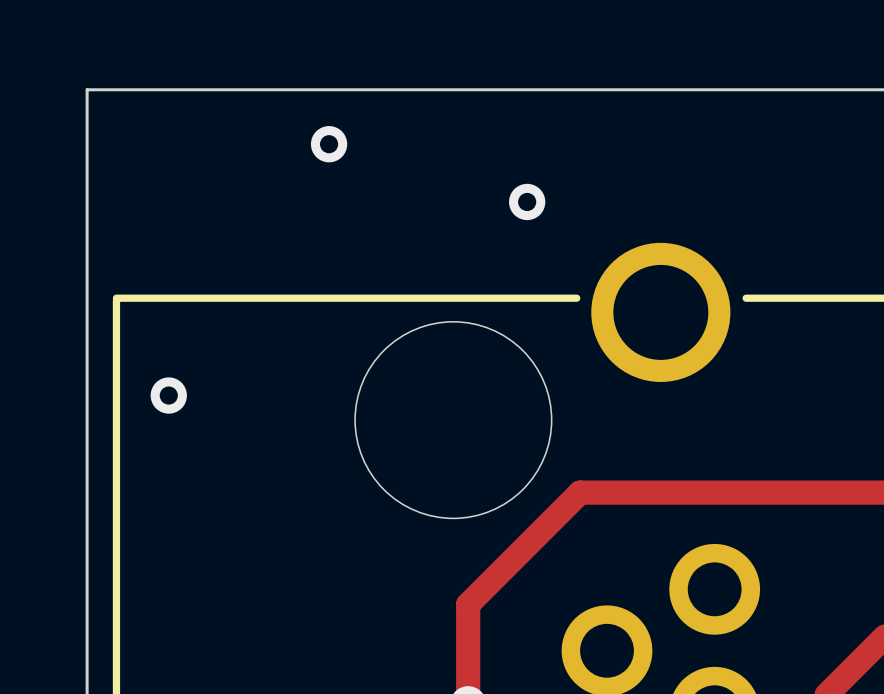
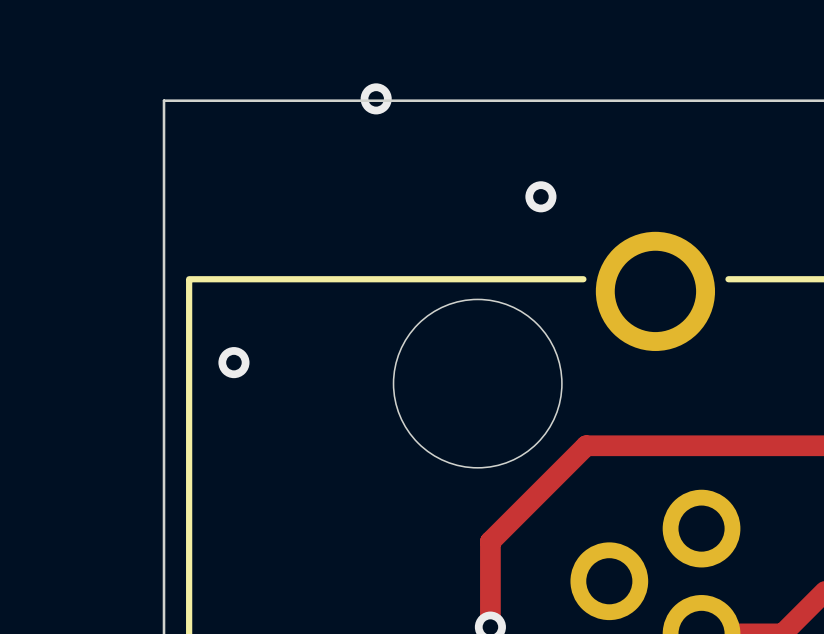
via position: (329, 144) -> (376, 98)

